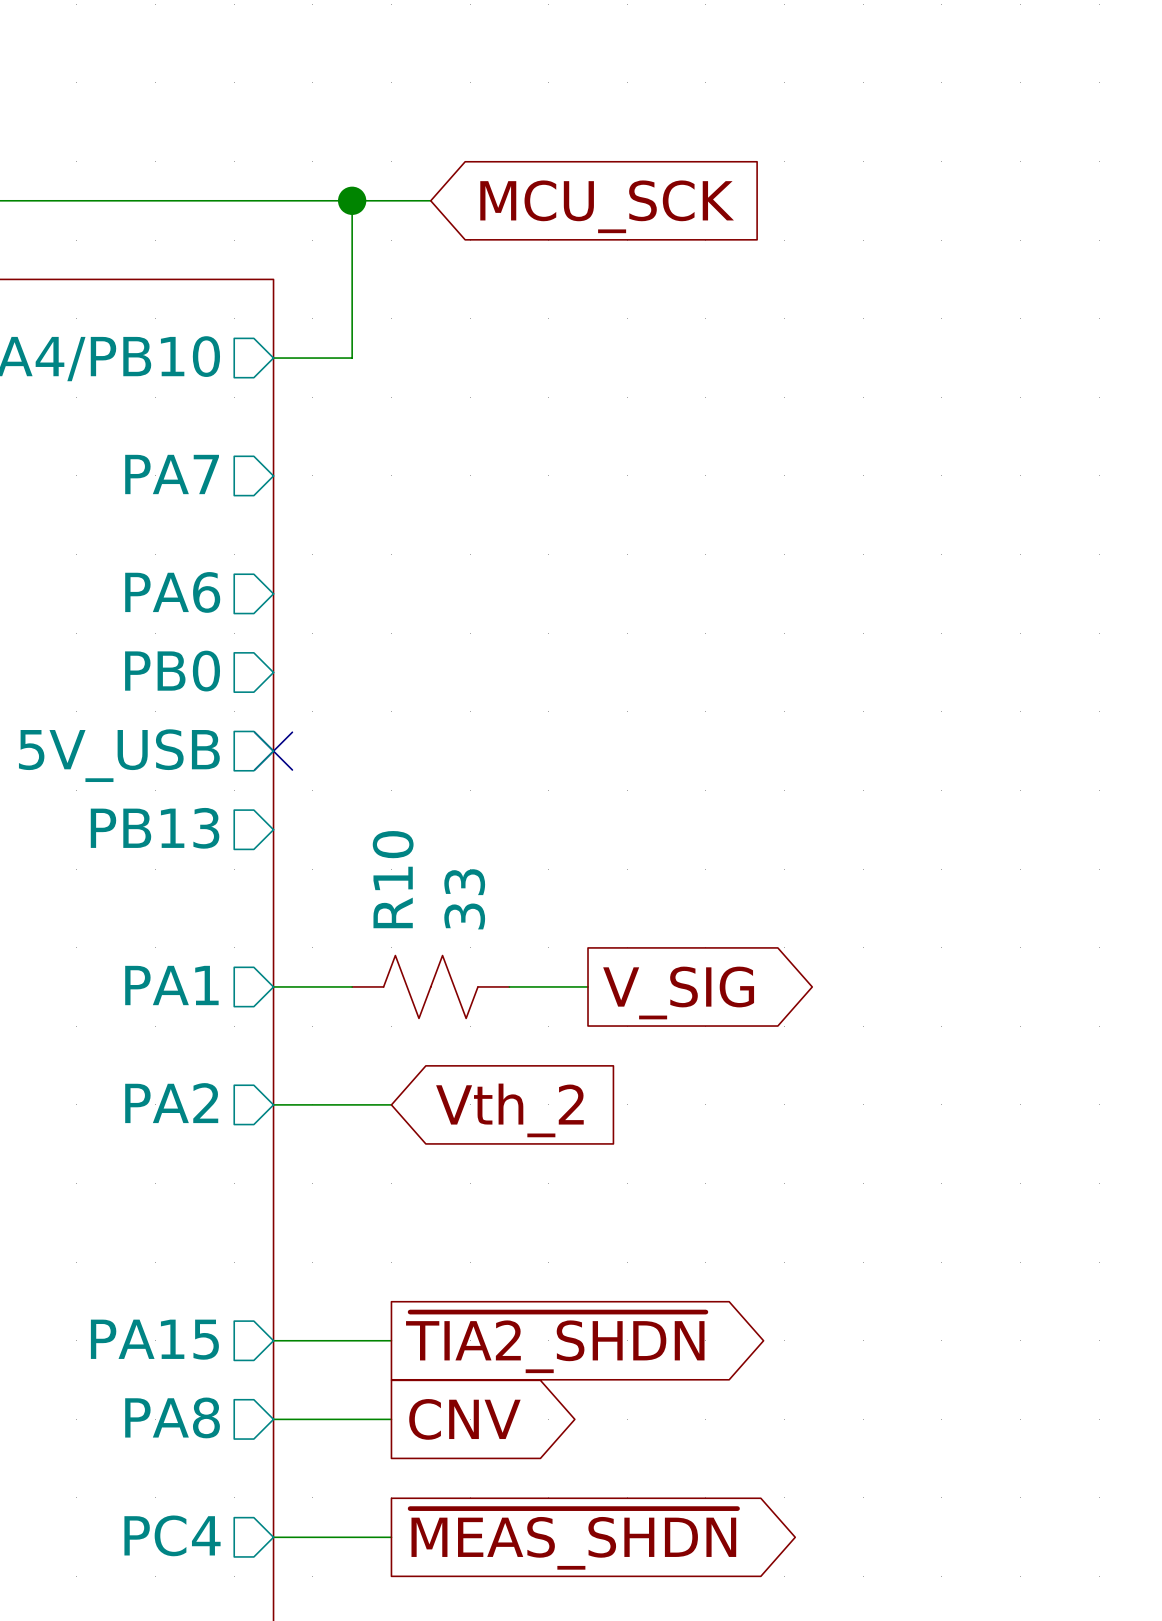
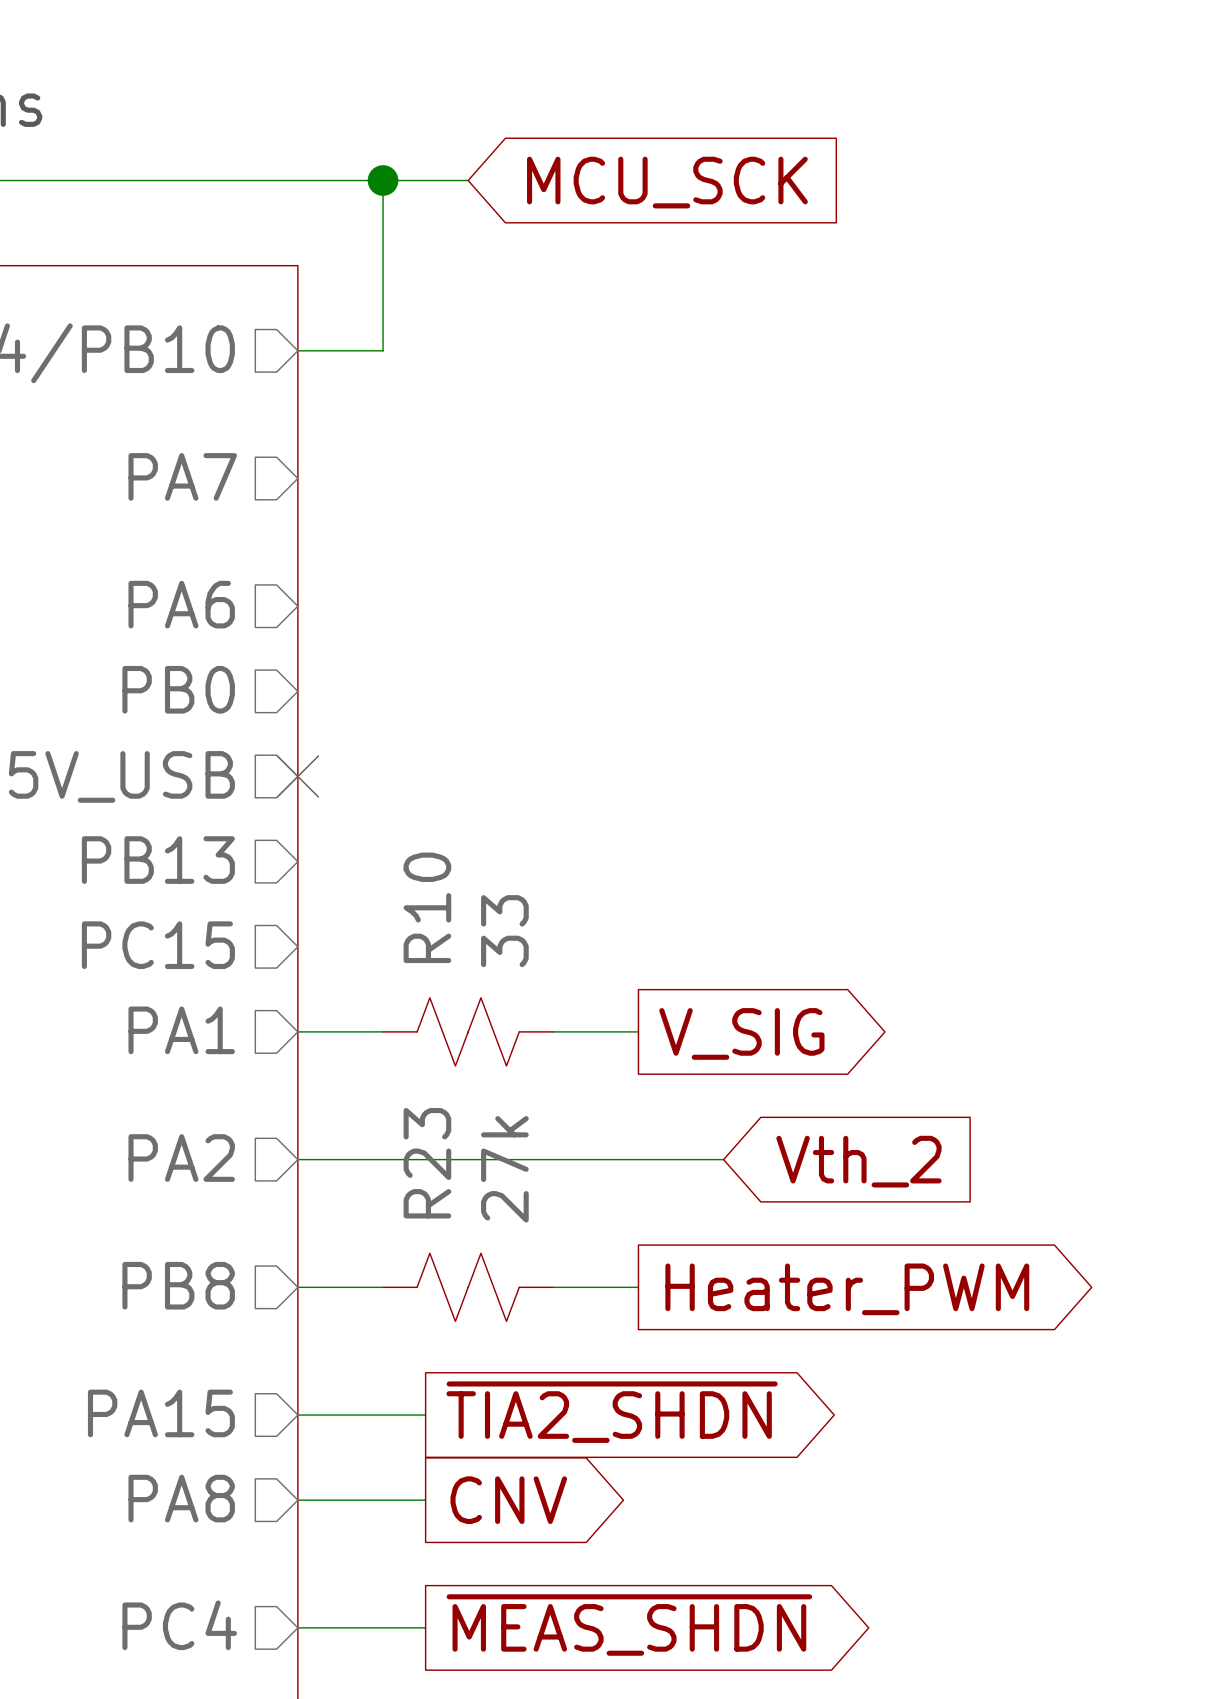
sheet pin: none -> PC15 (158, 945)
wire: none -> (425, 1159) (723, 1159)
global label position: Vth_2 (509, 1110) -> Vth_2 (858, 1161)
sheet pin: none -> PB8 (178, 1285)
wire: none -> (297, 1287) (383, 1287)
R23: none -> 27k (468, 1287)
wire: none -> (553, 1287) (638, 1287)
global label: none -> Heater_PWM (847, 1289)

